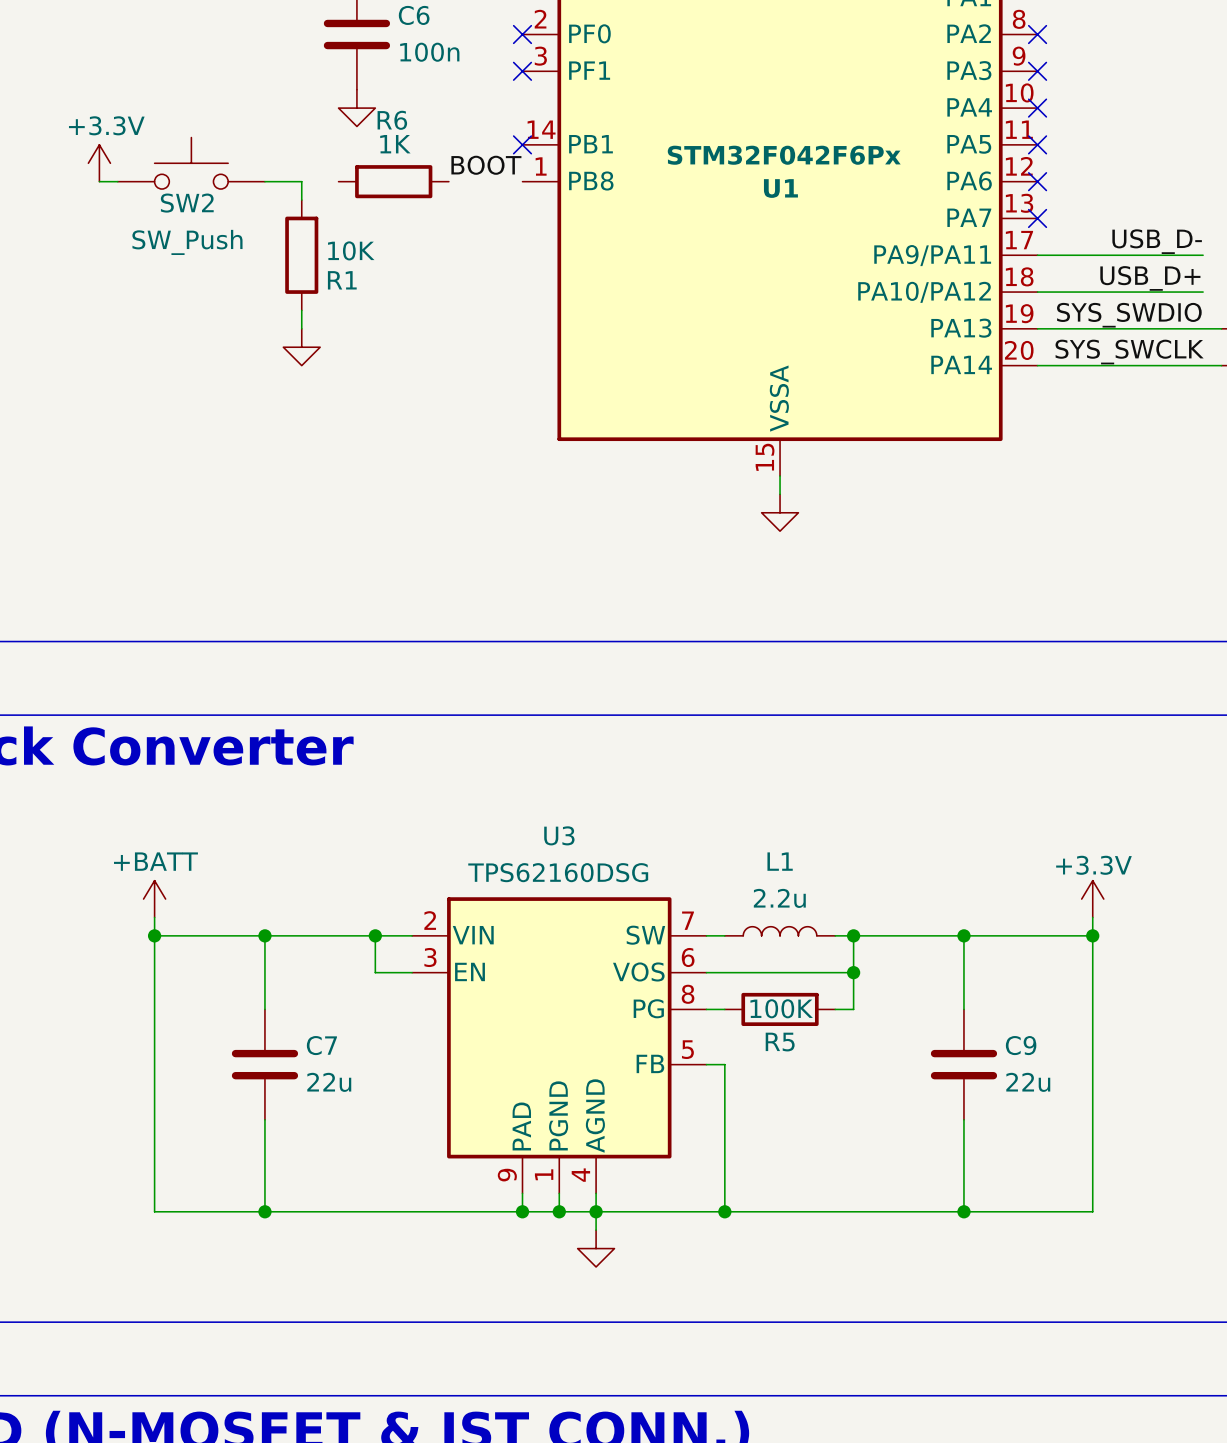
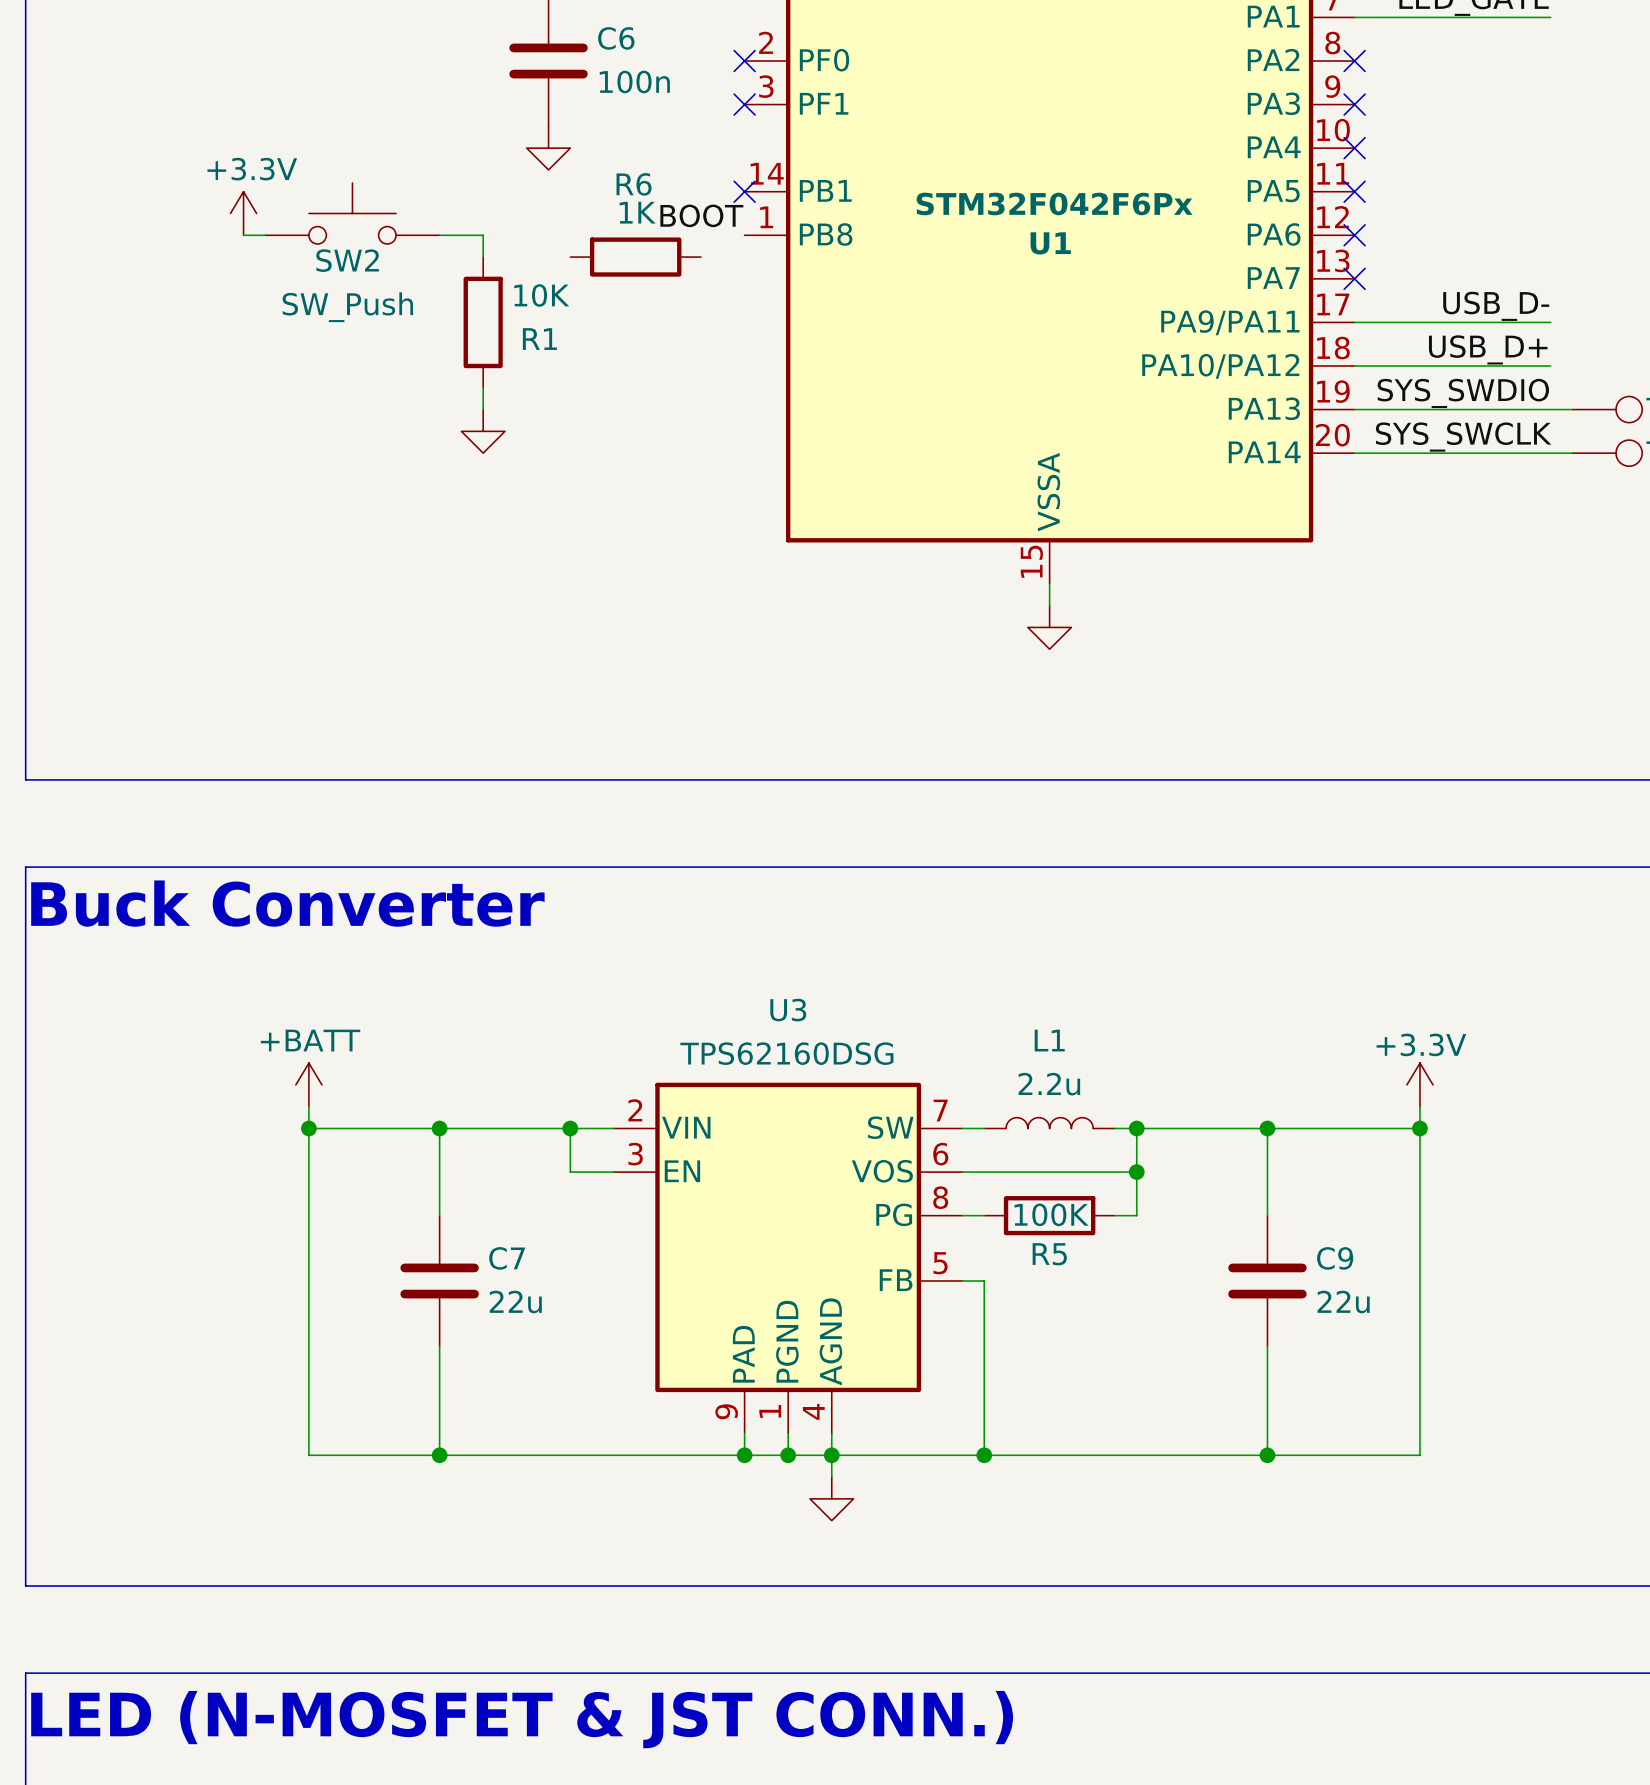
R6 position: (393, 181) -> (635, 257)
R1 value position: 10K (351, 250) -> 10K (541, 295)
R1 name position: R1 (342, 280) -> R1 (539, 339)

